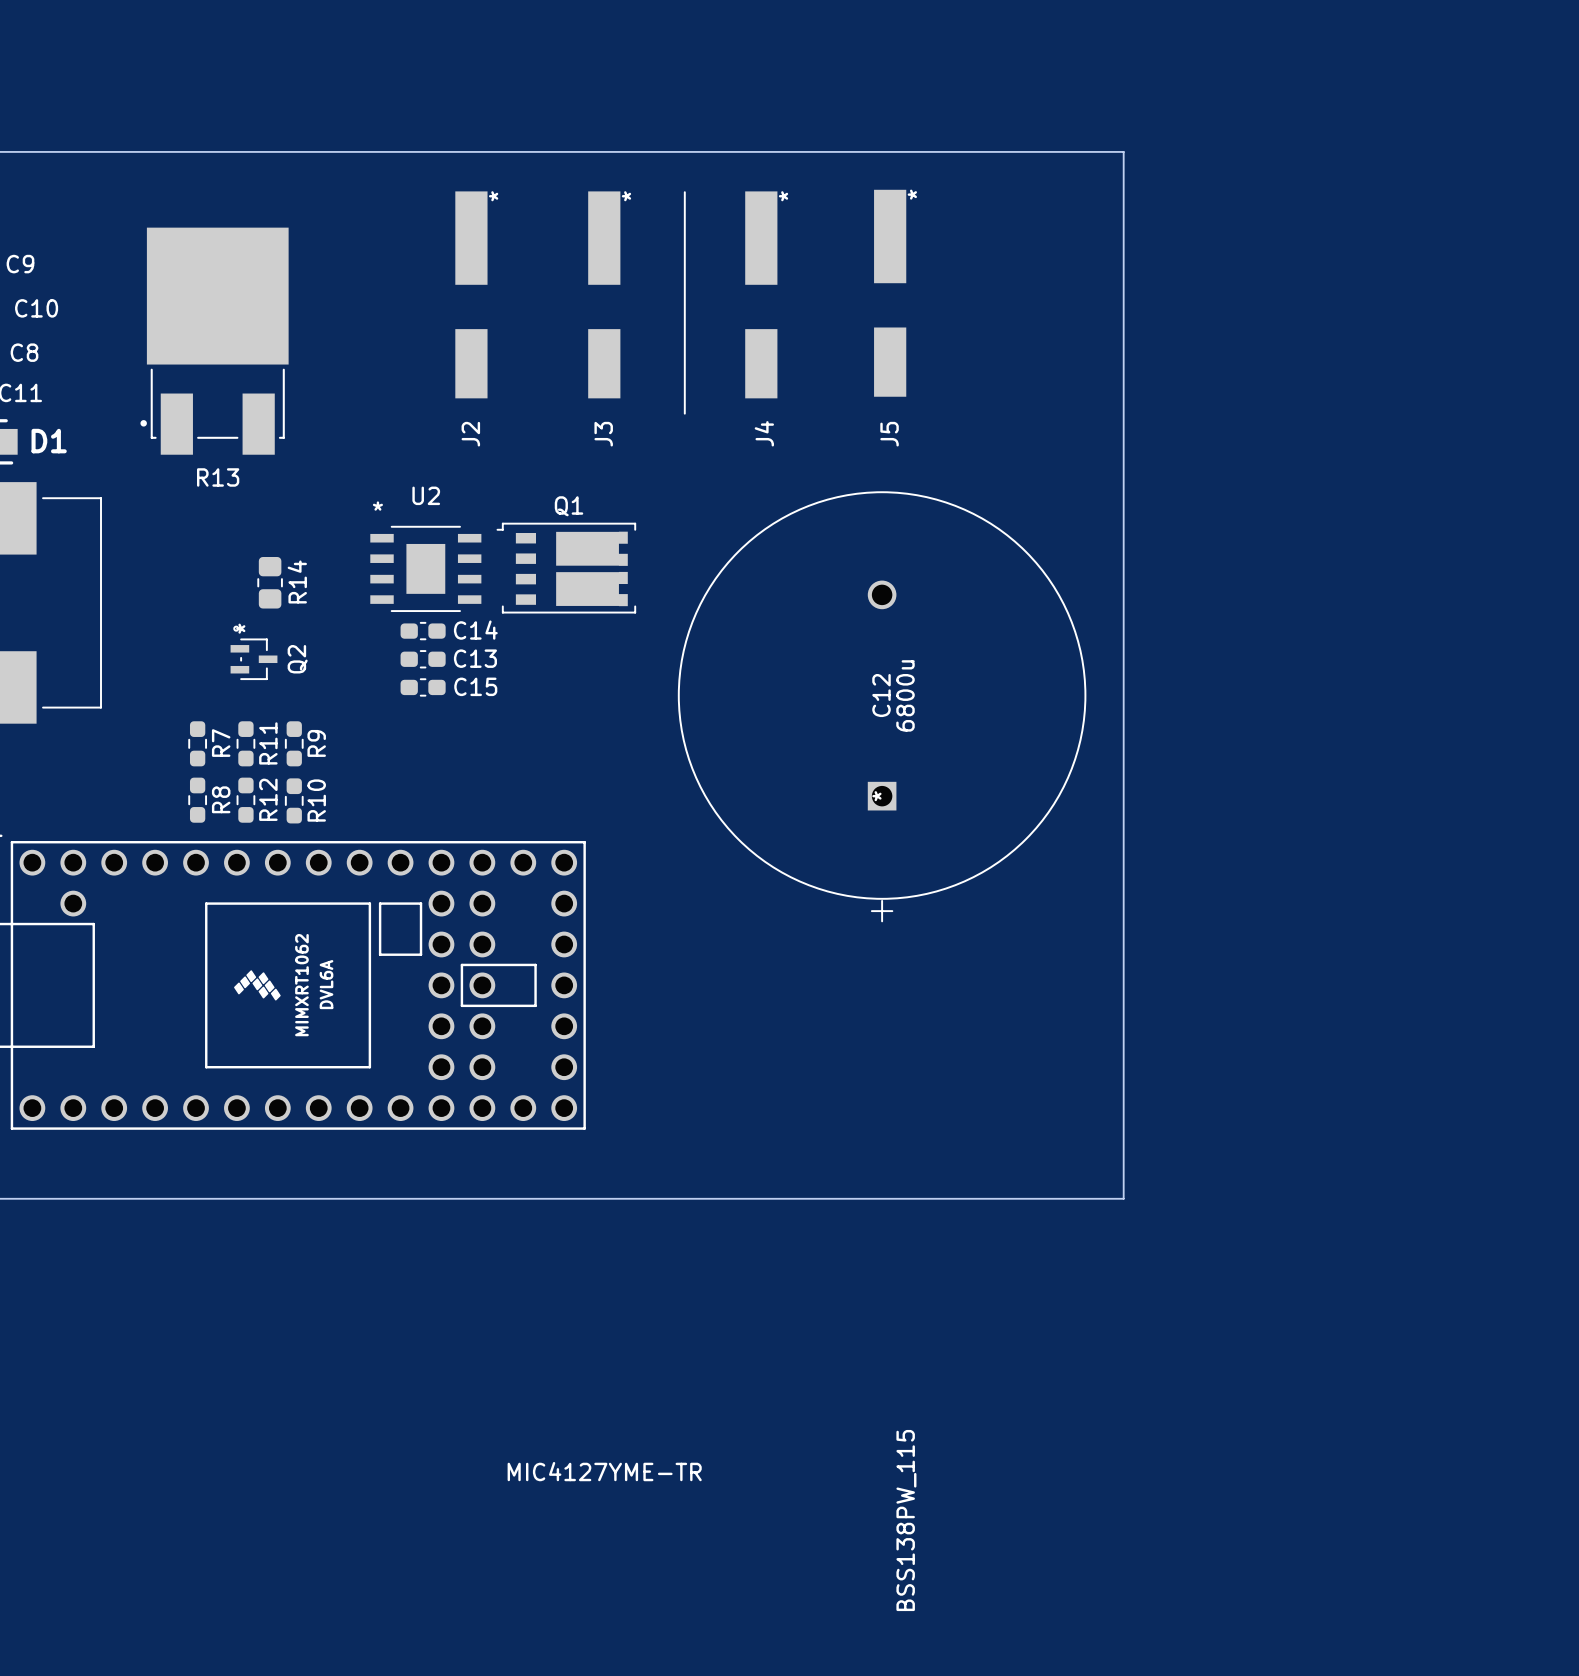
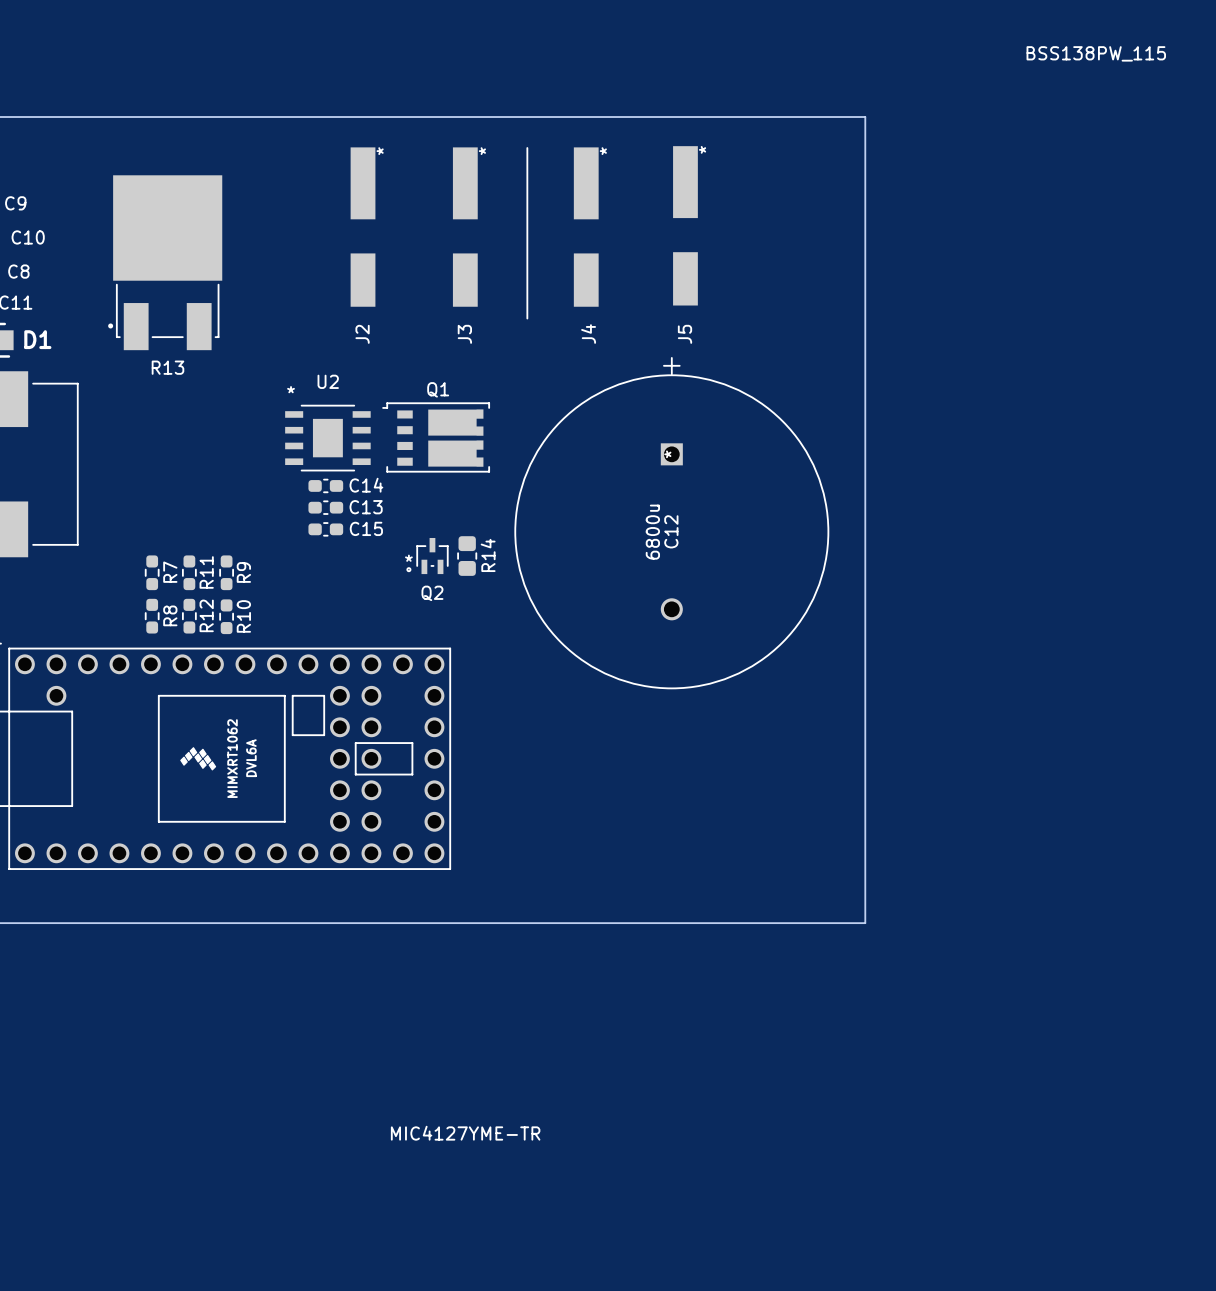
R14 position: (270, 582) -> (467, 556)
Q2 rotation: 0° (254, 652) -> 90° counterclockwise (427, 556)
Q2 position: (254, 652) -> (427, 556)
Q2 name position: Q2 (297, 659) -> Q2 (432, 593)
C12 rotation: 0° (882, 706) -> 180° (671, 523)

